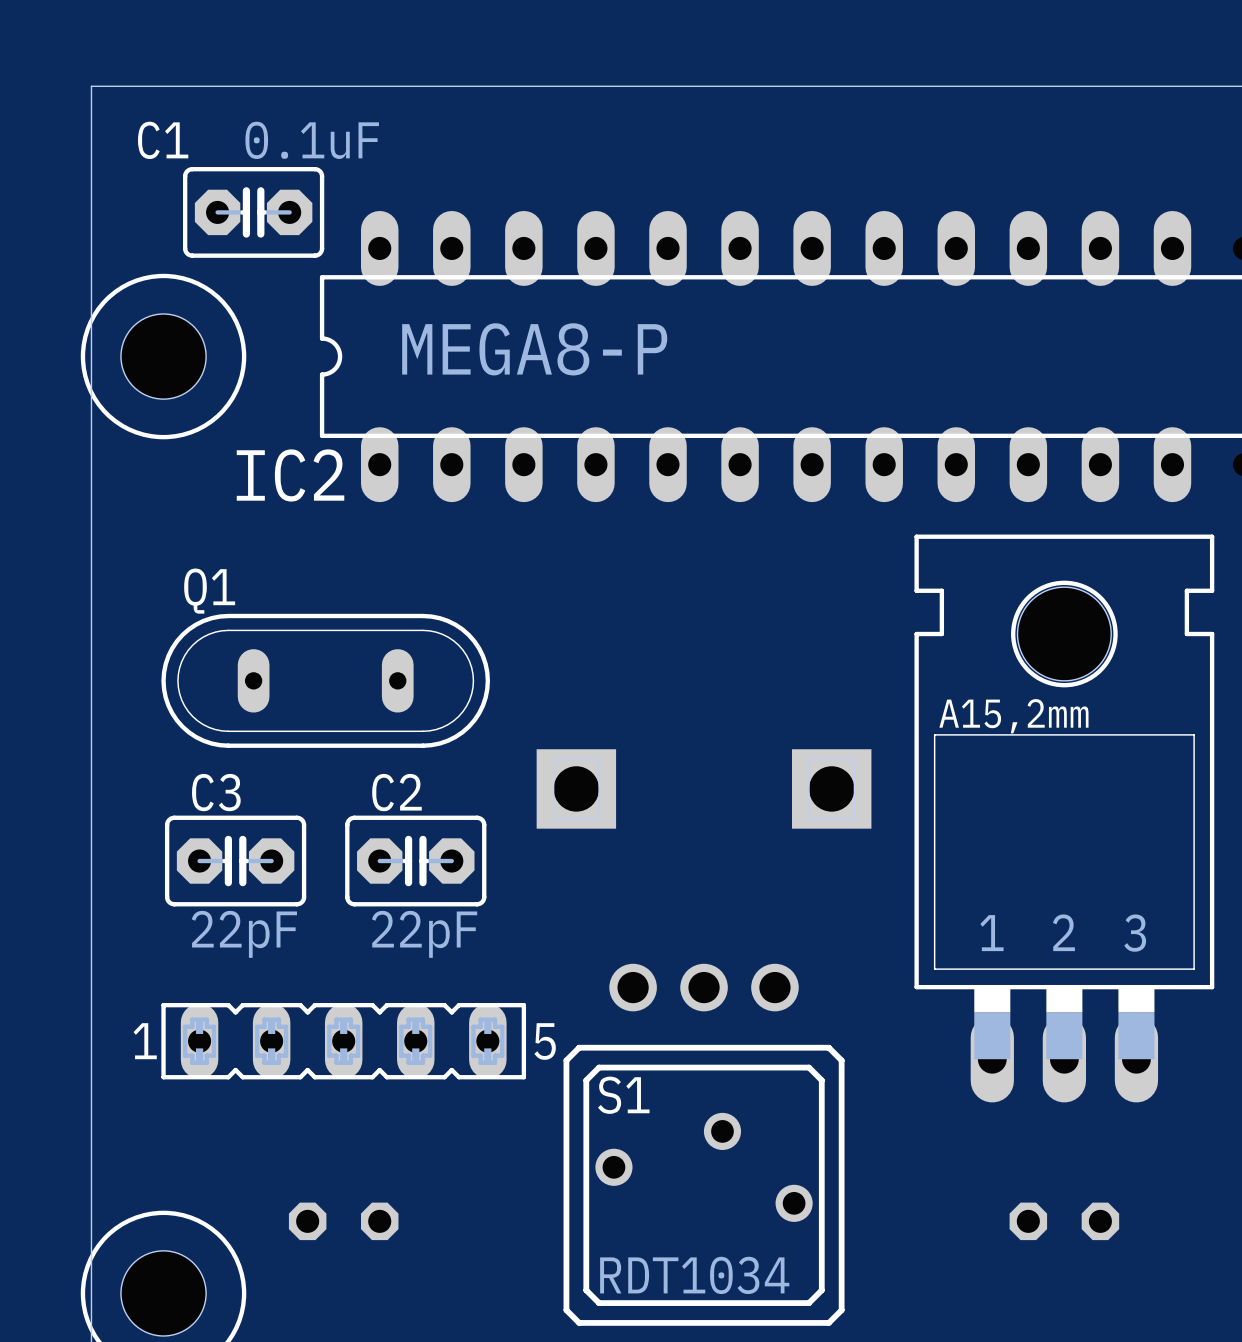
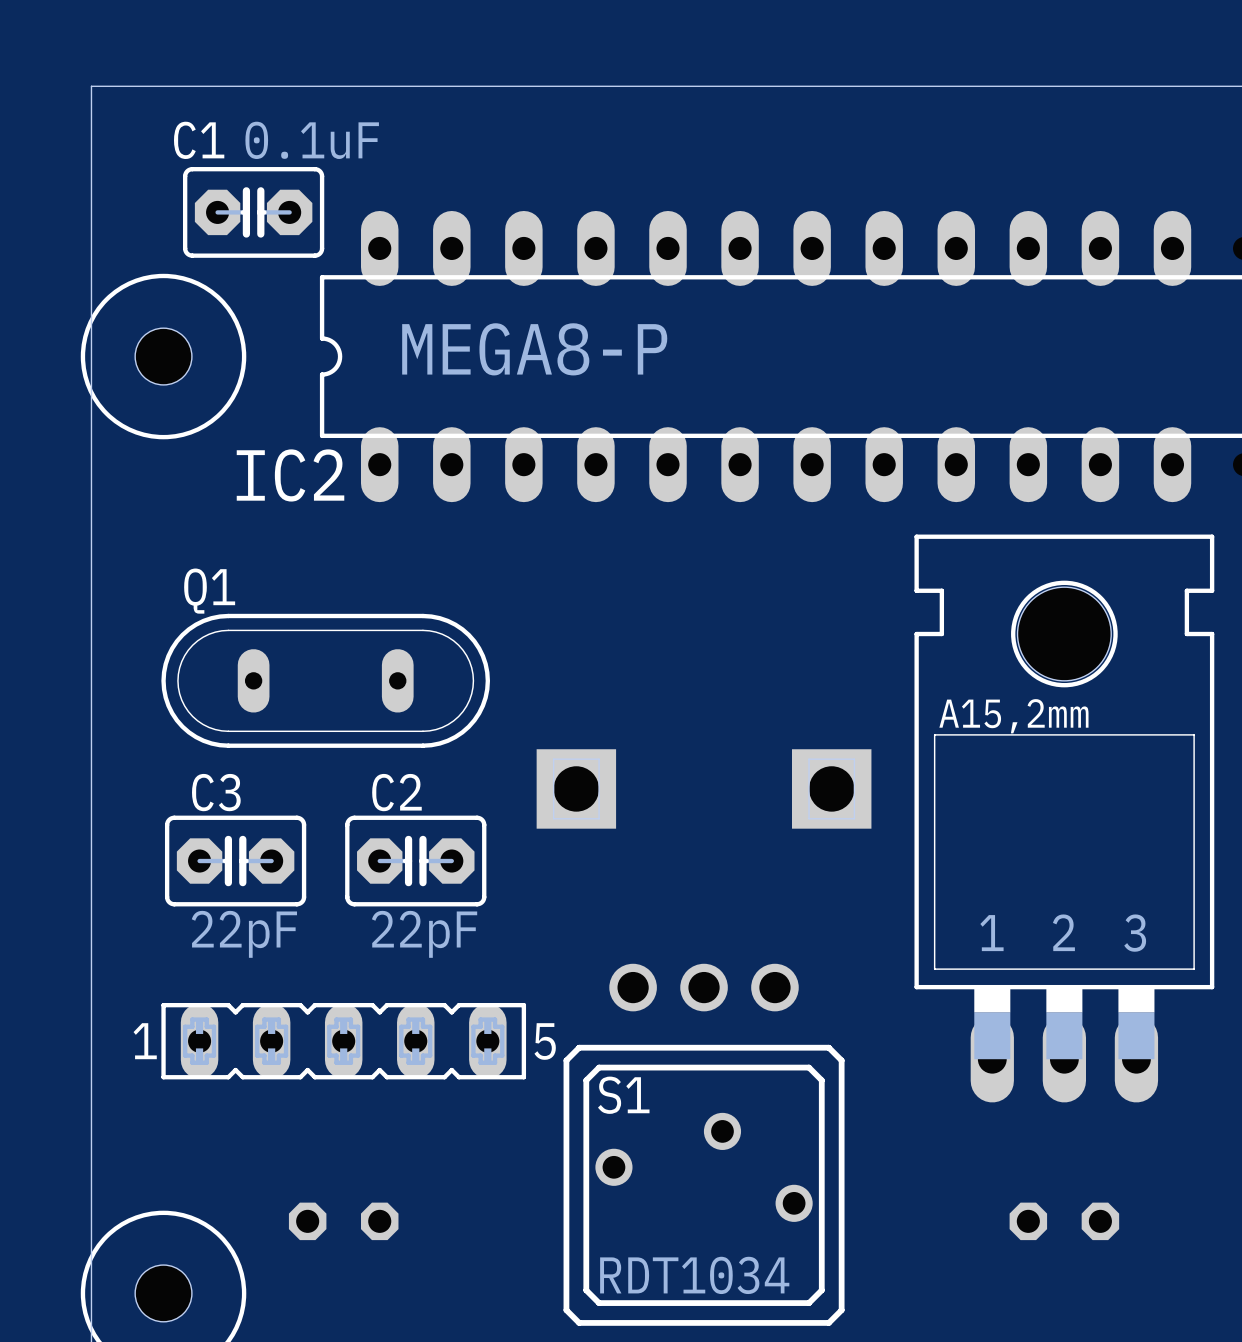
C1 name position: C1 (163, 140) -> C1 (199, 140)
hole size: [120, 313, 207, 400] -> [135, 328, 192, 385]
hole size: [120, 1250, 207, 1336] -> [135, 1265, 192, 1322]

